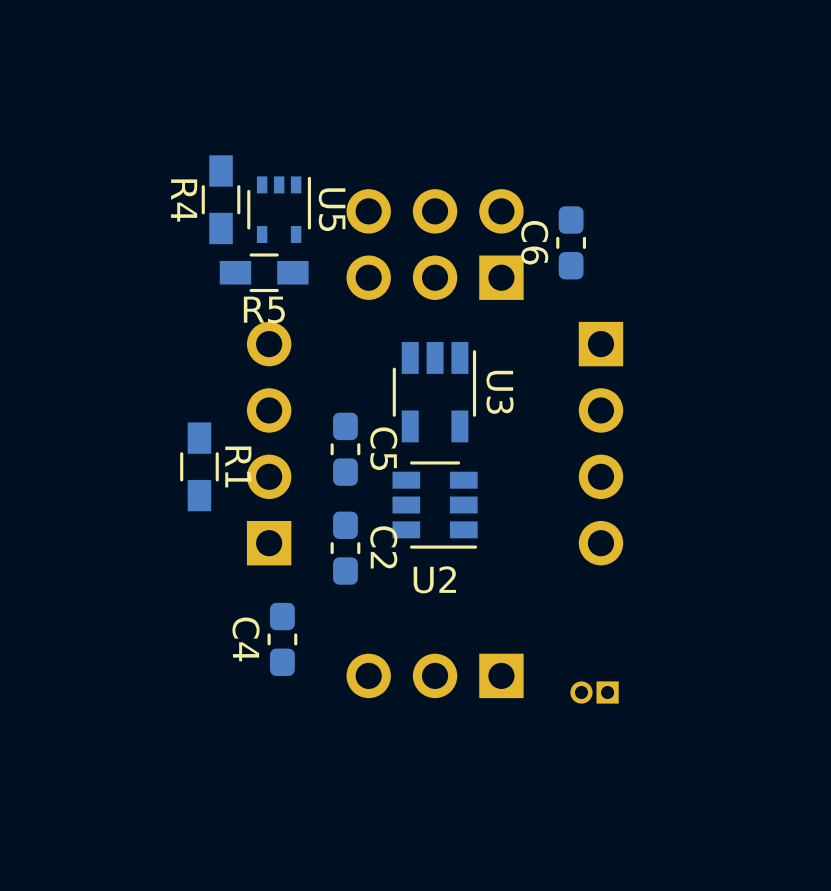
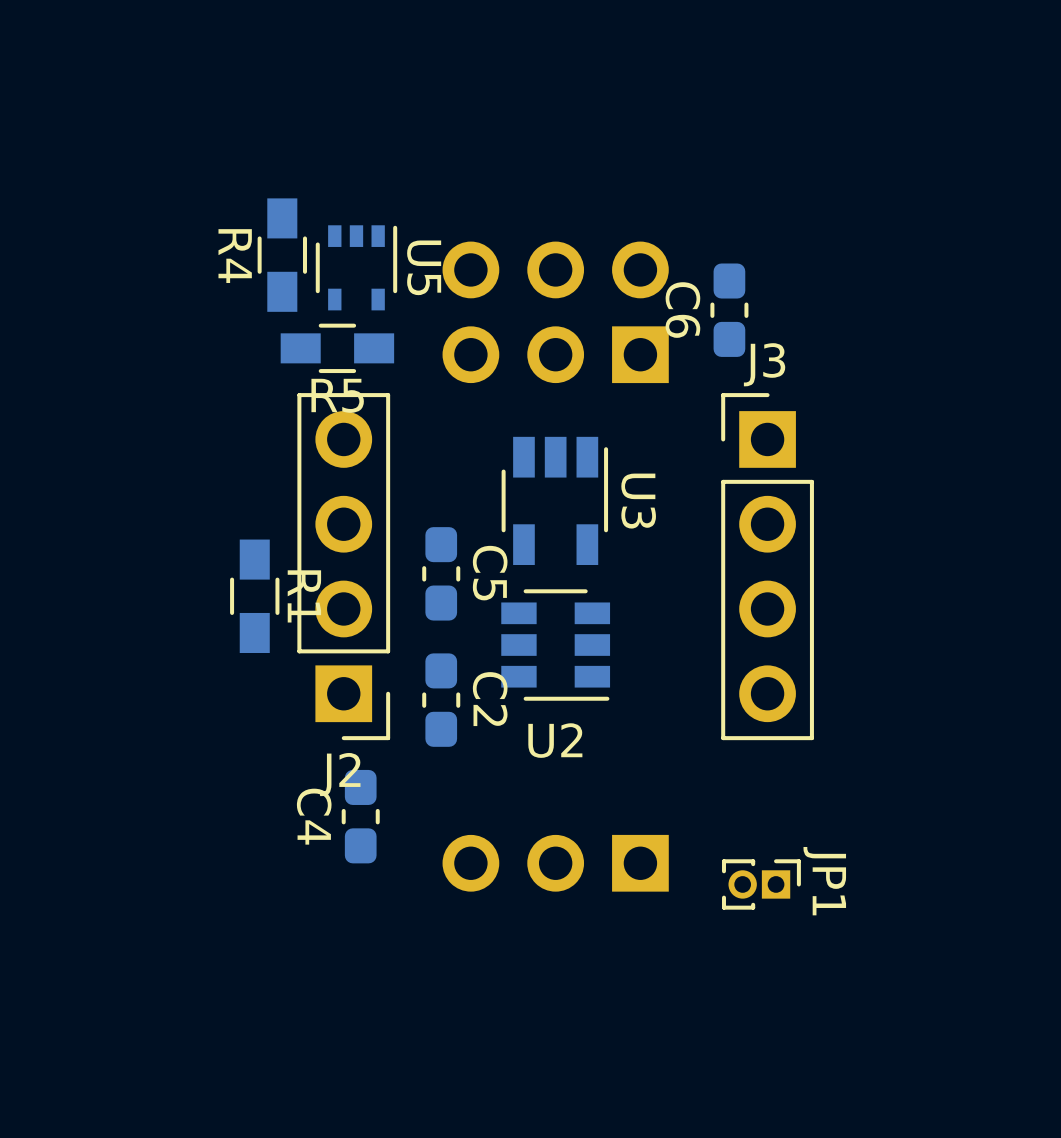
J2 side: top (269, 443) -> bottom (343, 566)
J3 side: top (600, 443) -> bottom (767, 566)
JP1 side: top (594, 692) -> bottom (761, 884)

